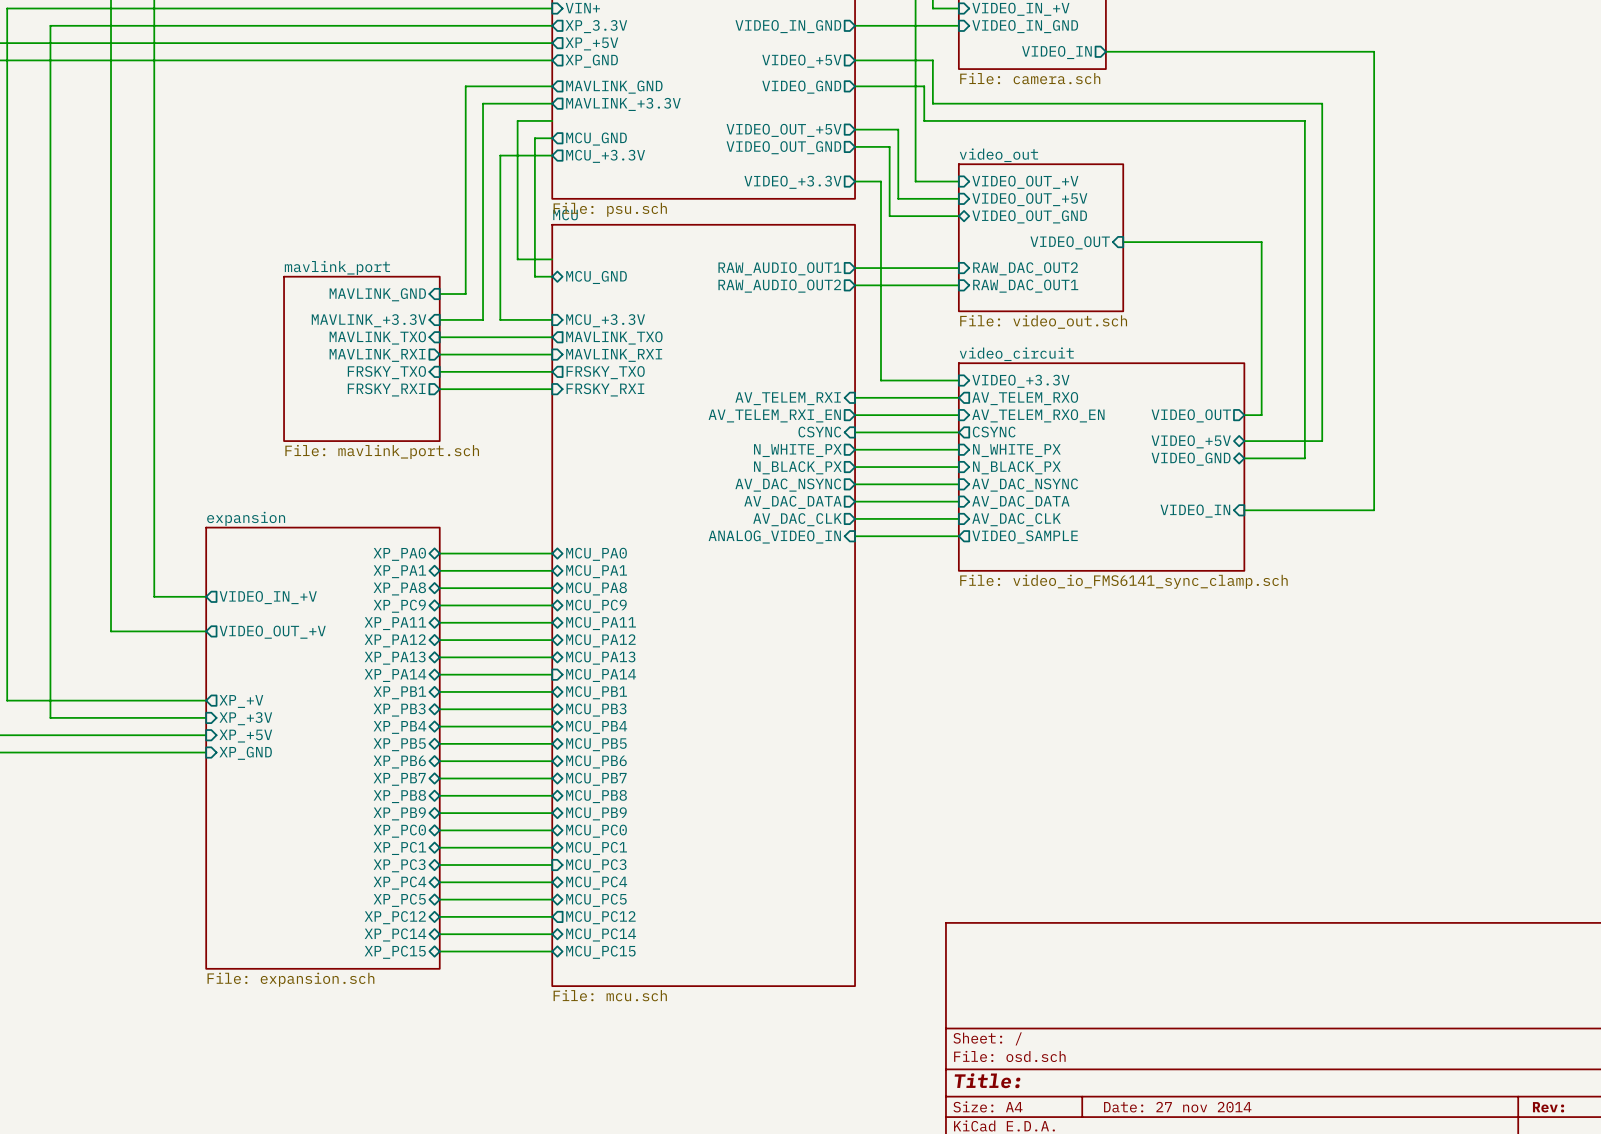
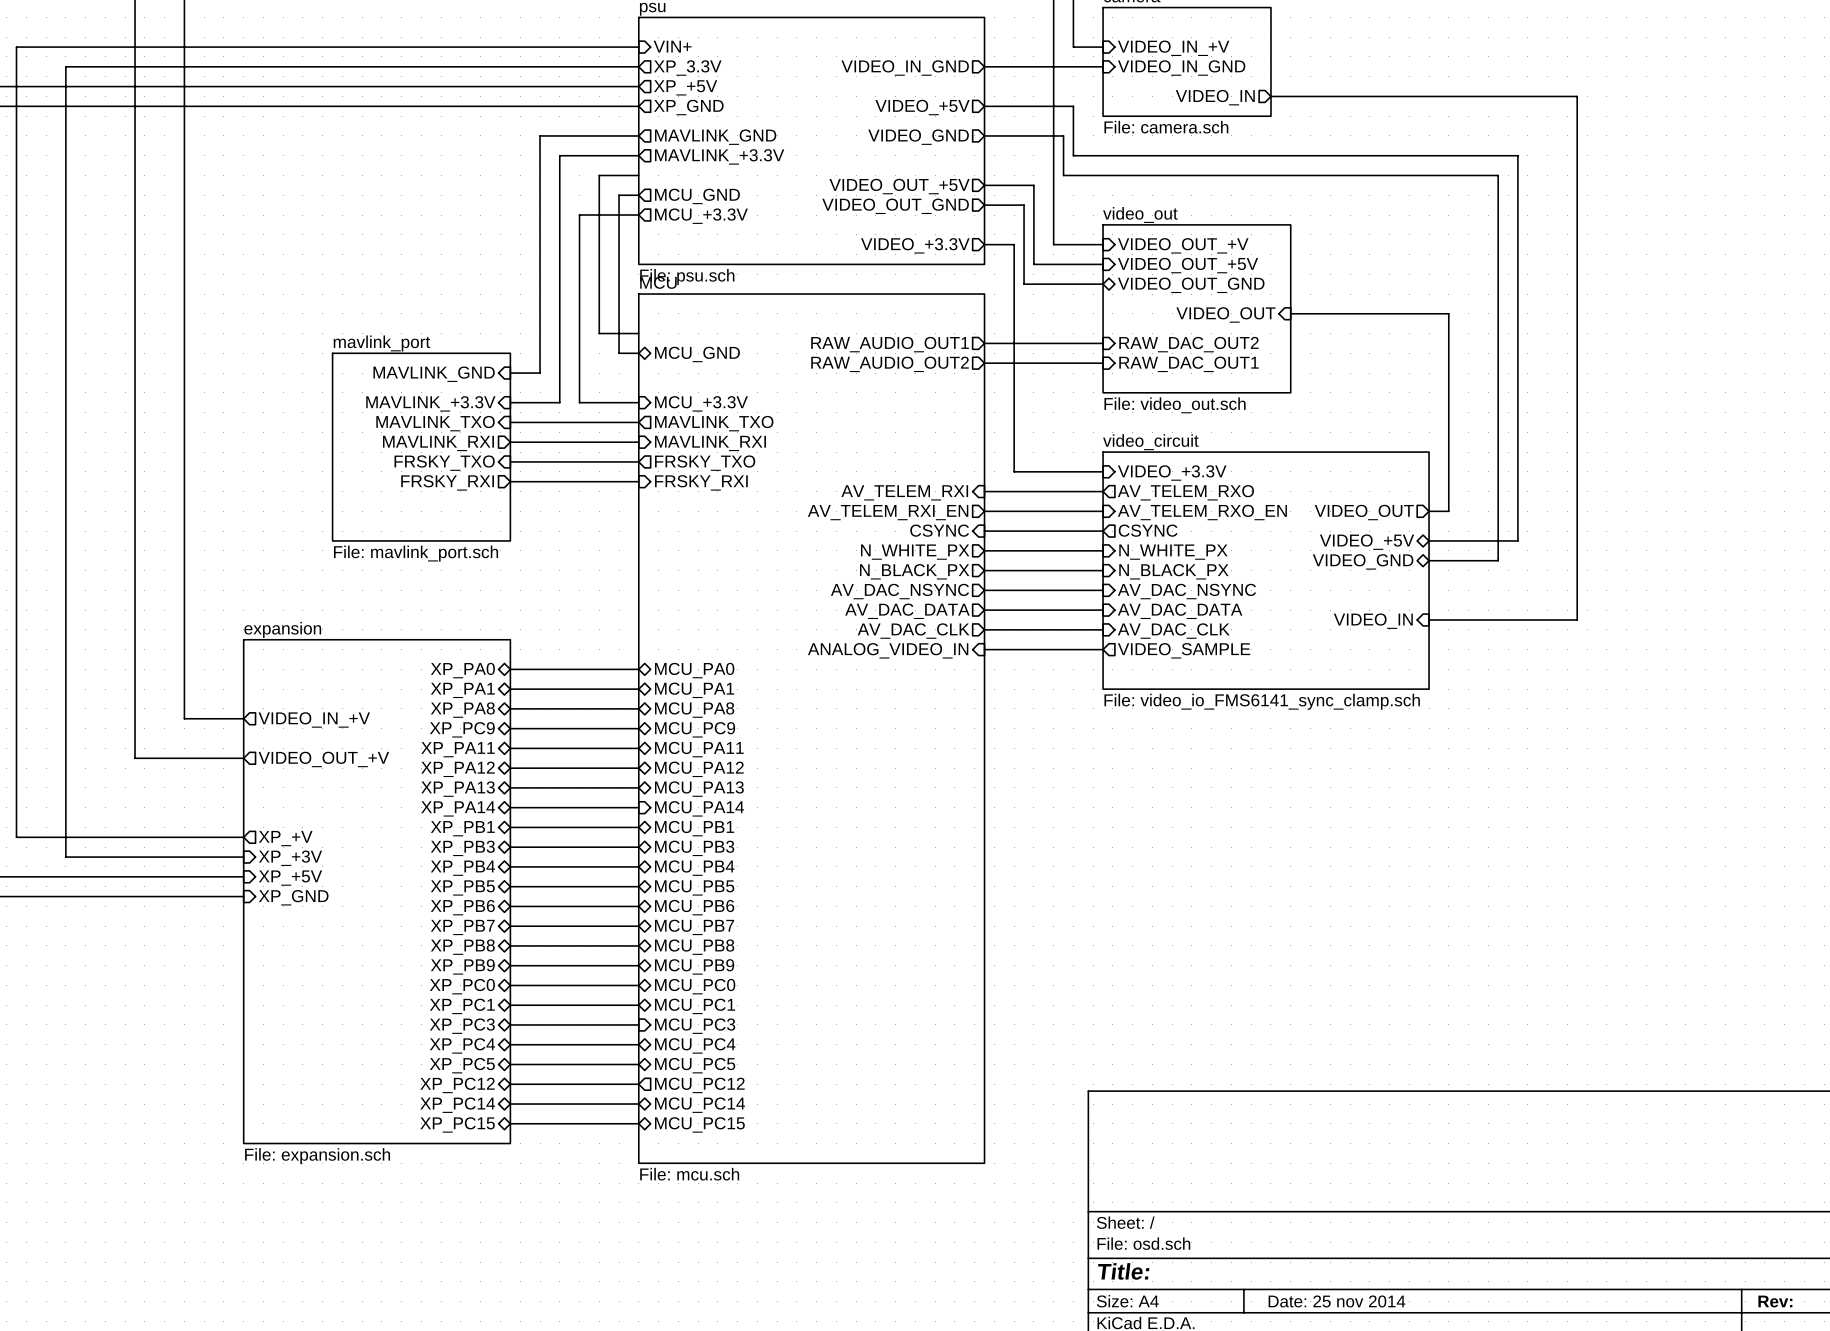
title block: Date: 27 nov 2014 (1177, 1107) -> Date: 25 nov 2014 (1336, 1301)

